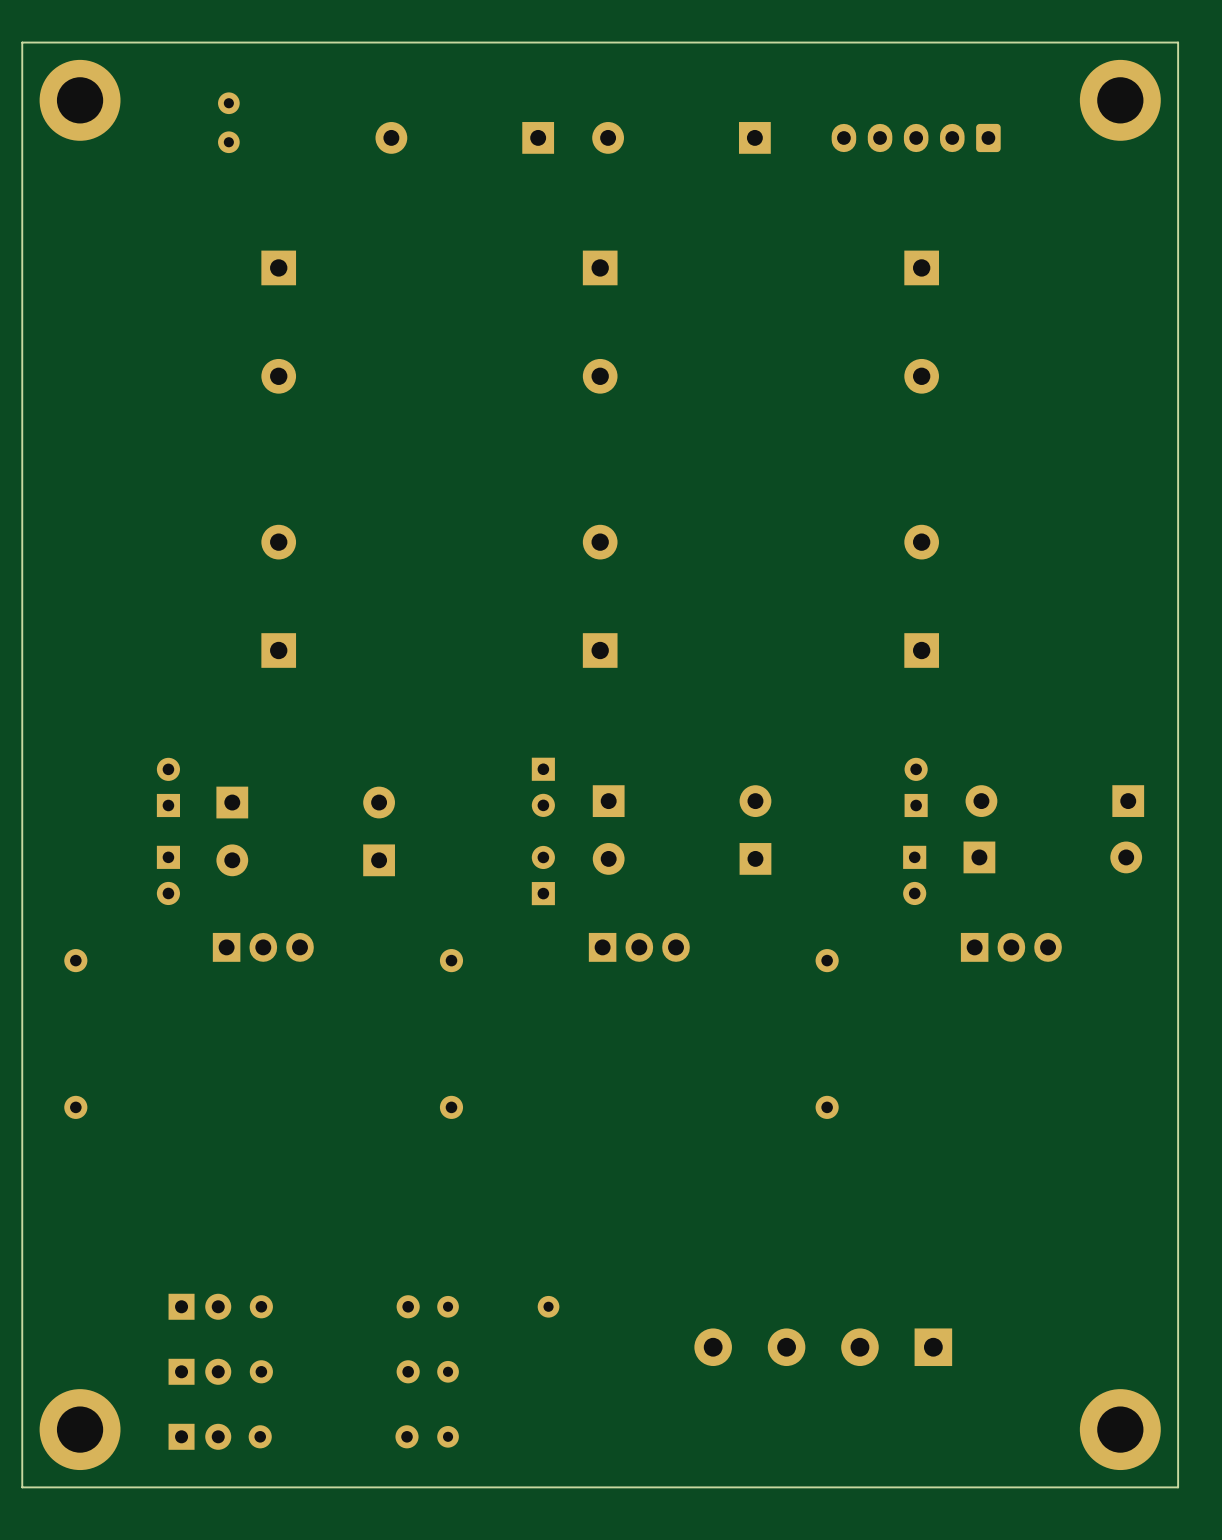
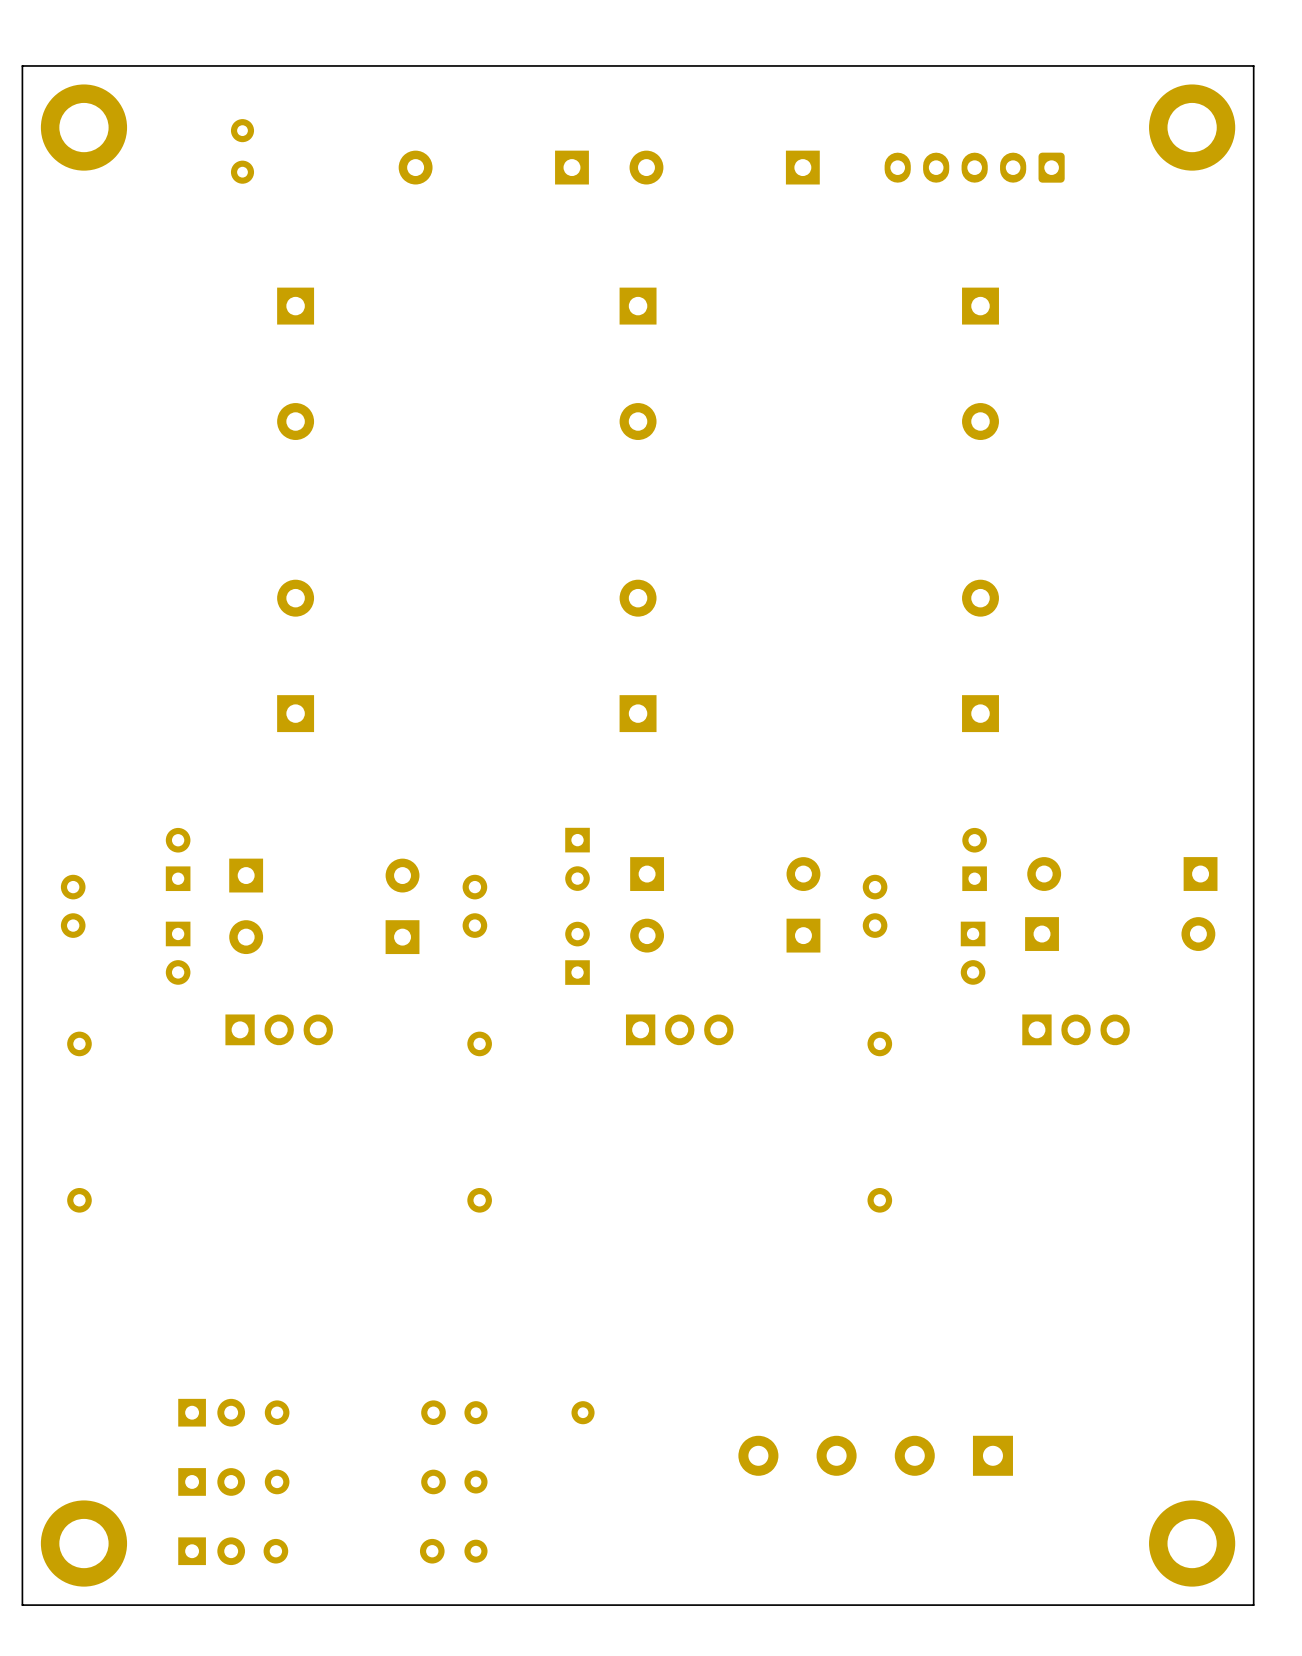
part: none -> (73, 906)
part: none -> (474, 906)
part: none -> (875, 906)

